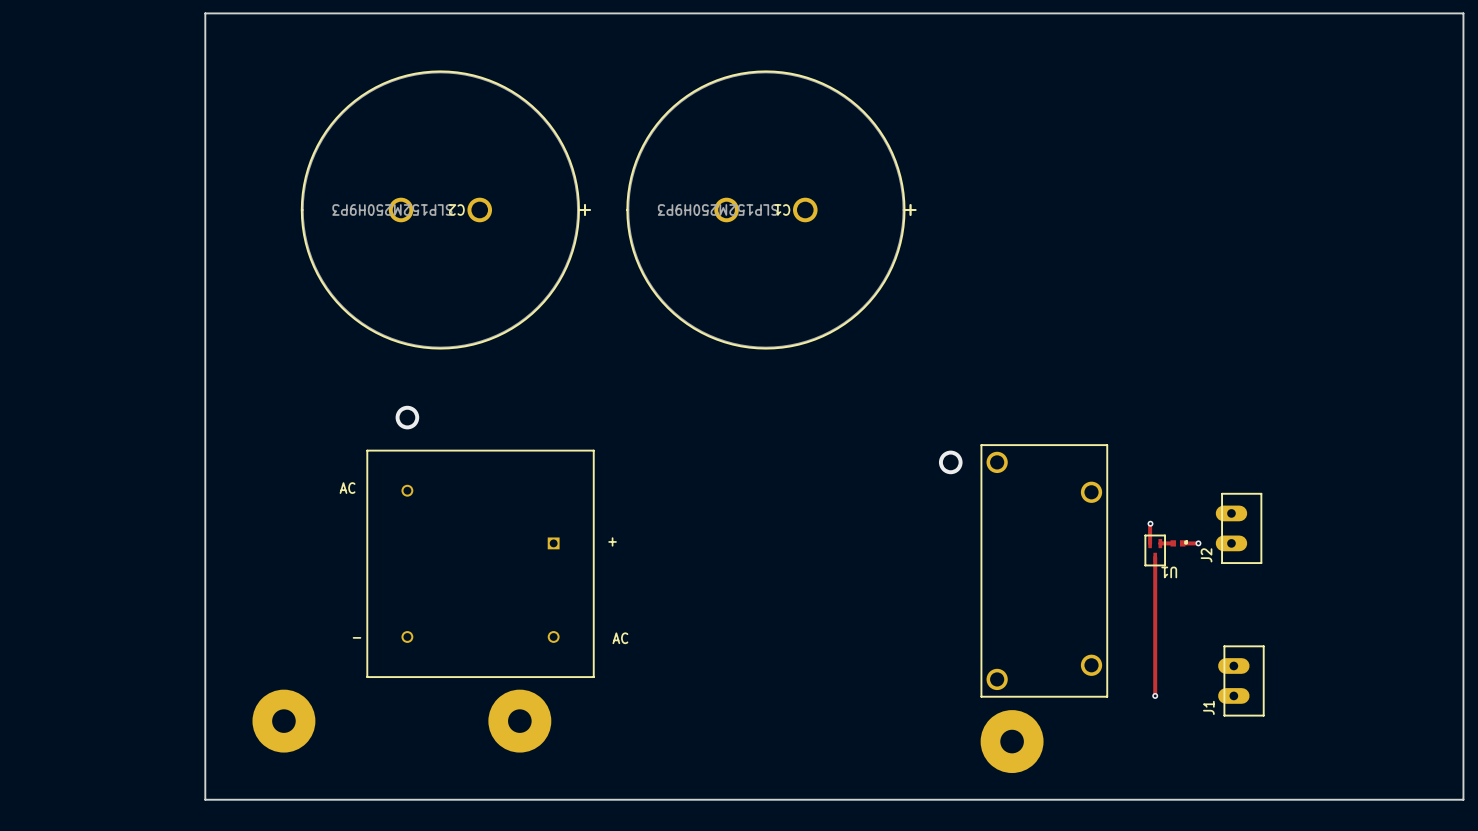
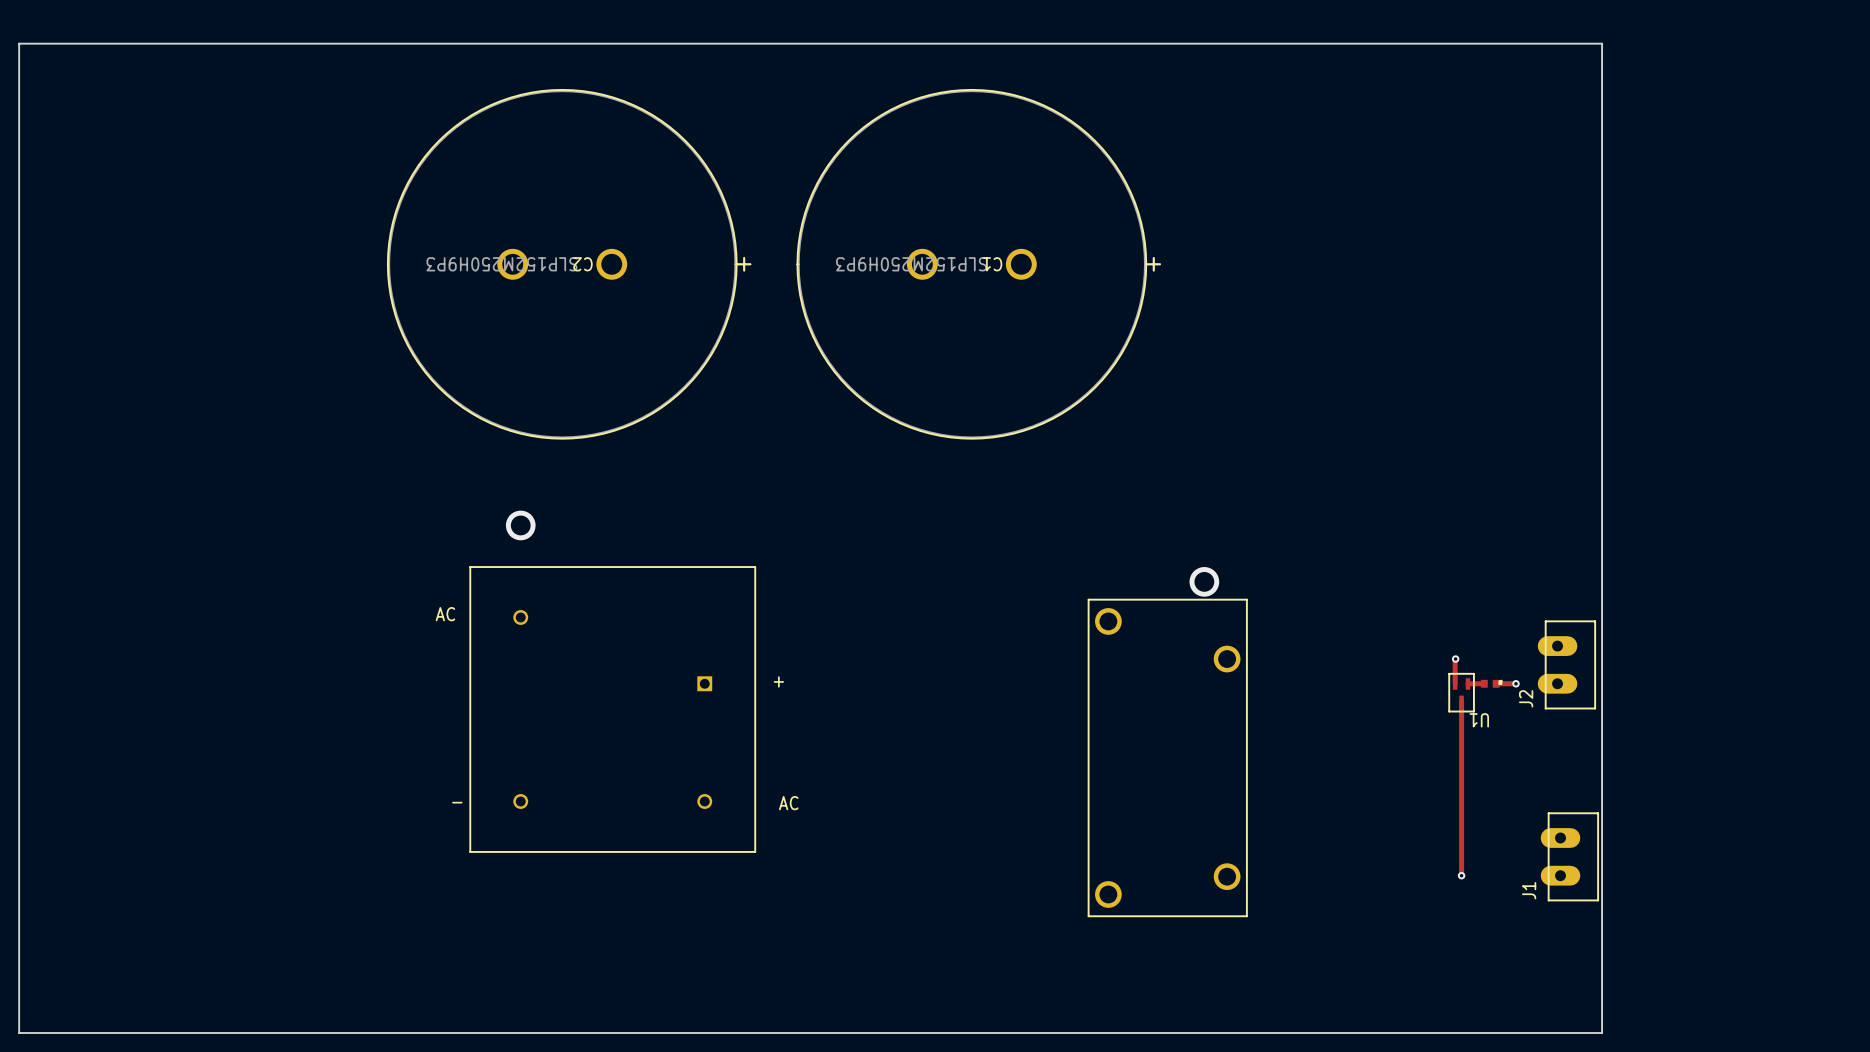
board edge: (205, 13) (1463, 13) (1463, 799) (205, 799) (205, 13) -> (19, 43) (1602, 43) (1602, 1032) (19, 1032) (19, 43)
part position: (1044, 570) -> (1167, 757)
part: (283, 721) -> none
part: (519, 721) -> none
part: (1012, 741) -> none

